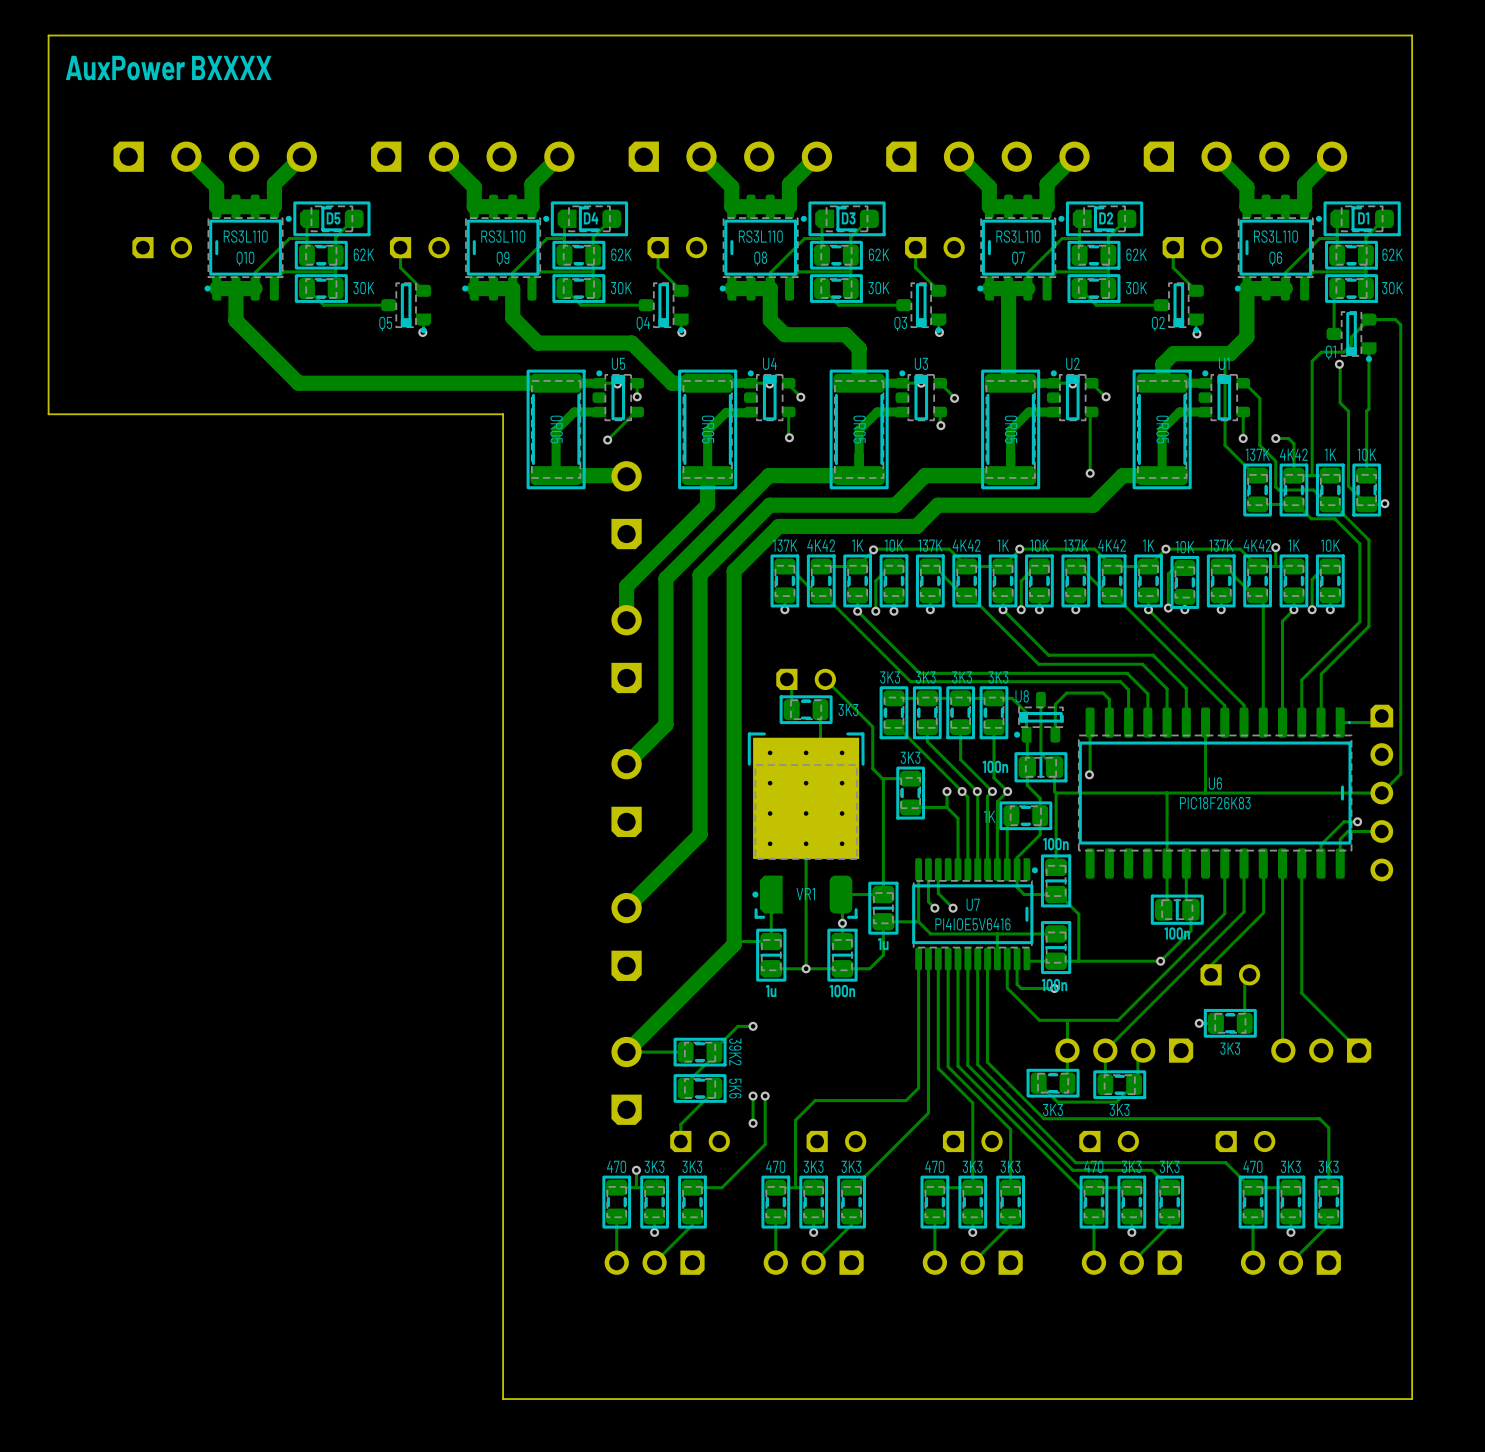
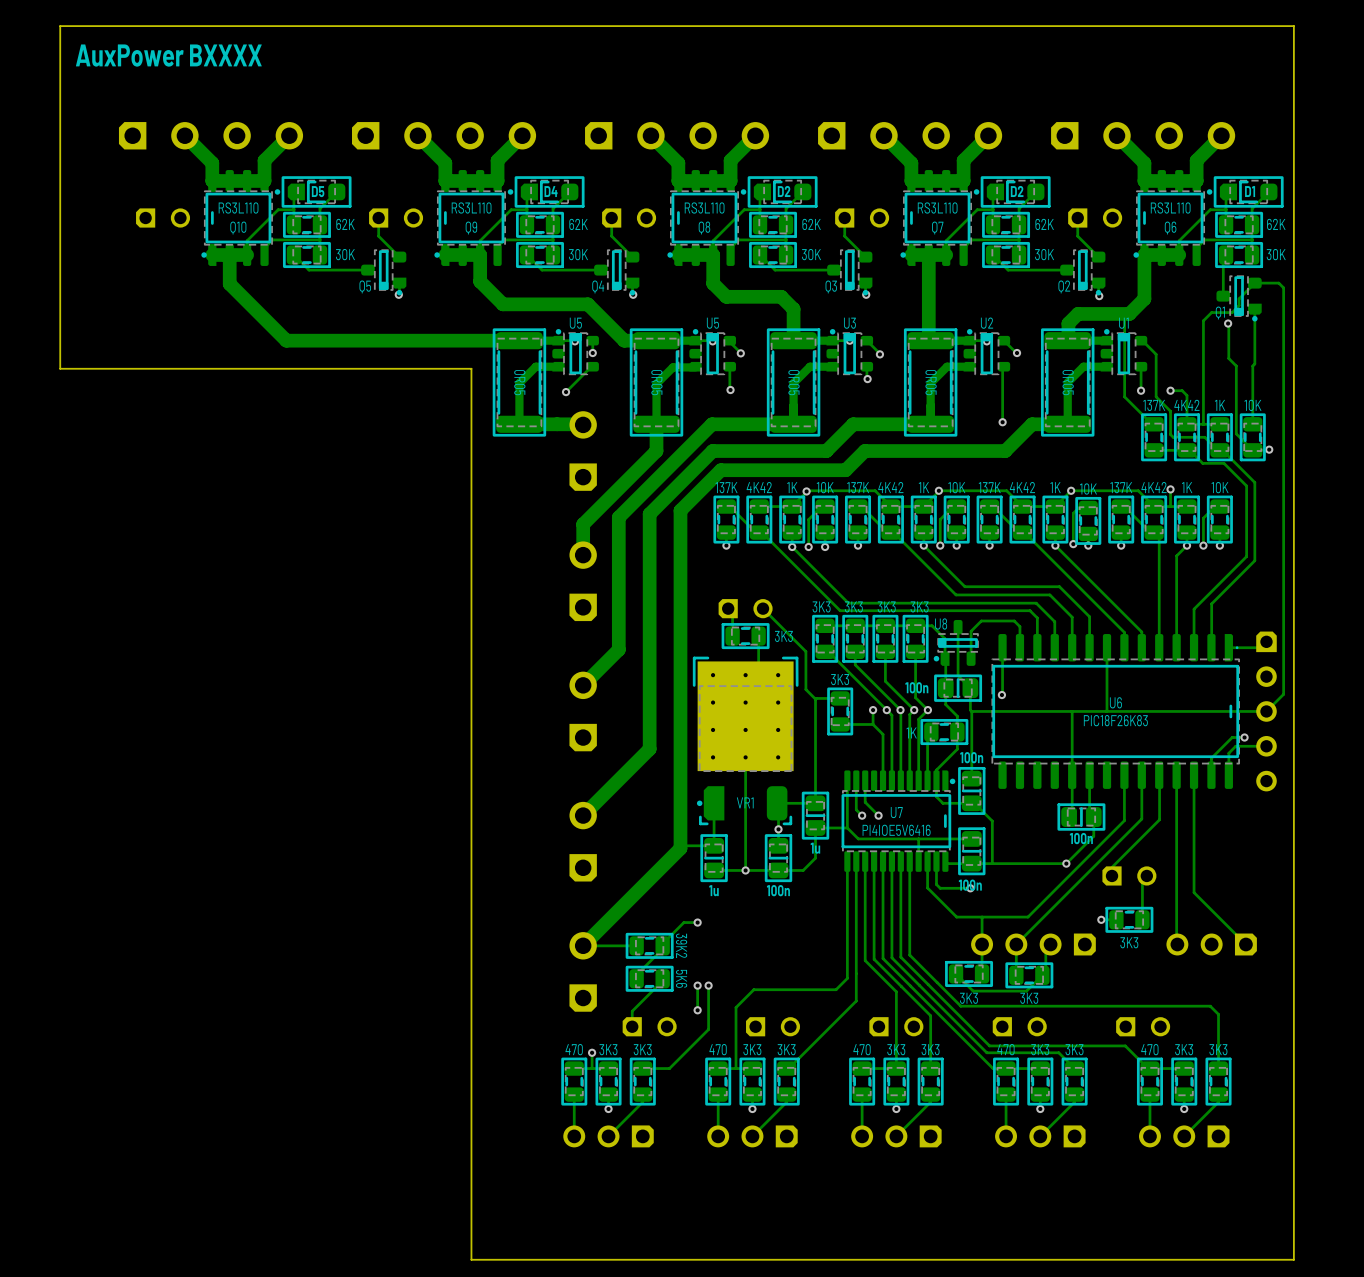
D3 name: D3 (848, 218) -> D2 (784, 191)
U4 name: U4 (769, 363) -> U5 (712, 323)

